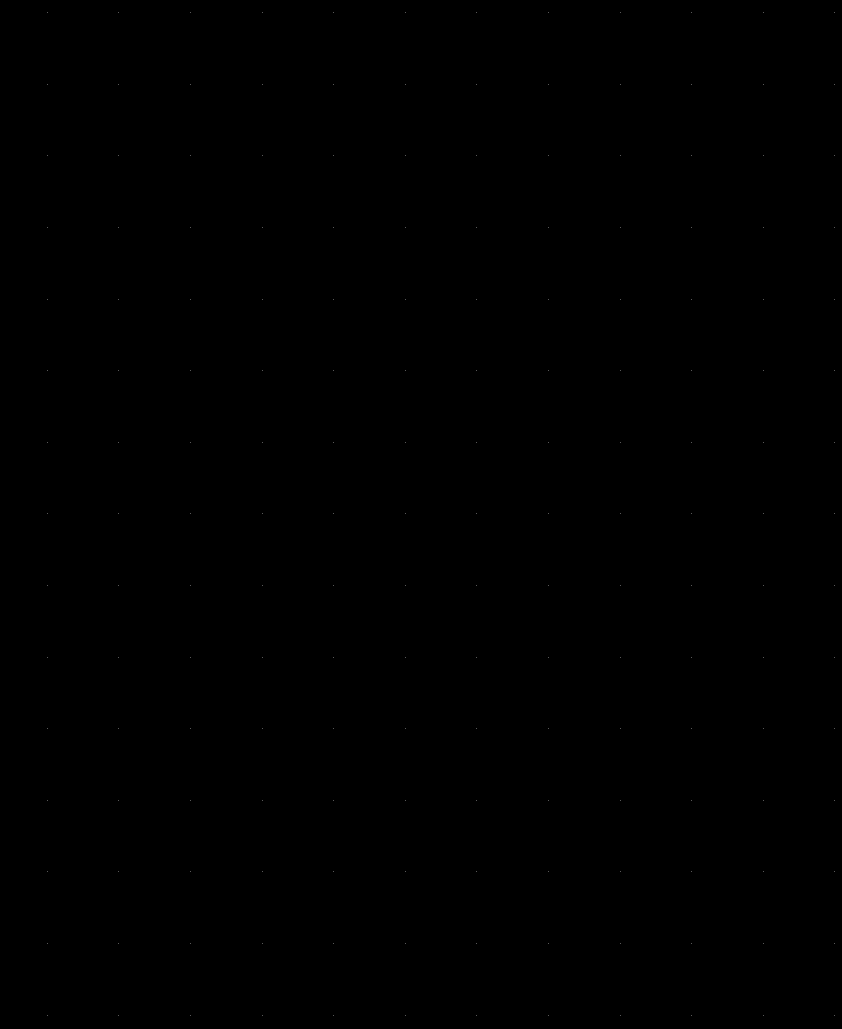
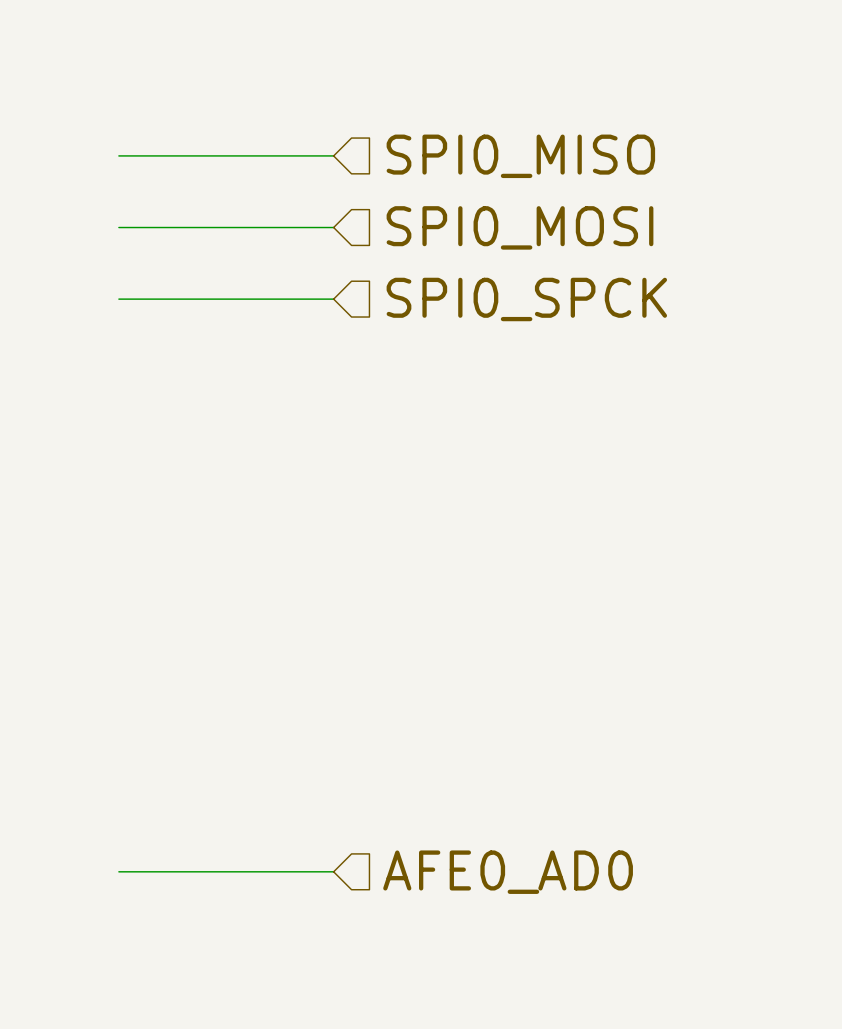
wire: none -> (118, 155) (333, 155)
hierarchical label: none -> SPI0_MISO (520, 156)
wire: none -> (118, 227) (333, 227)
hierarchical label: none -> SPI0_MOSI (520, 227)
wire: none -> (118, 299) (333, 299)
hierarchical label: none -> SPI0_SPCK (526, 299)
wire: none -> (118, 871) (333, 871)
hierarchical label: none -> AFE0_AD0 (508, 872)

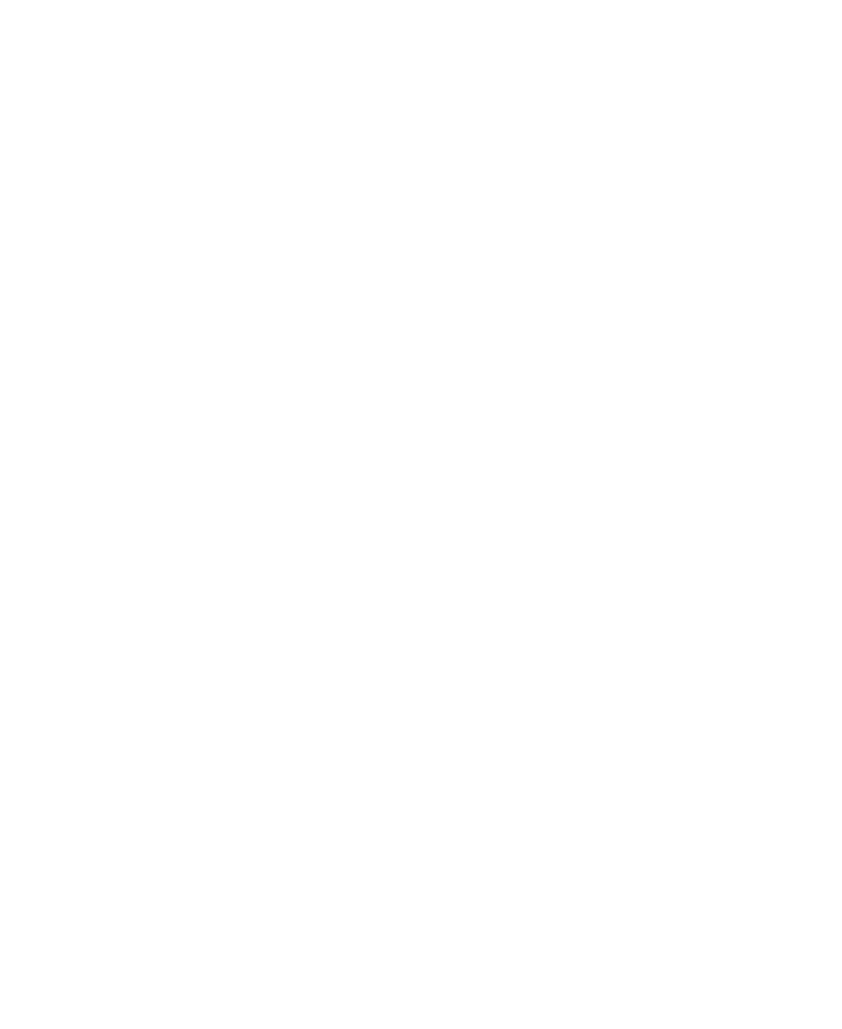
wire: (118, 155) (333, 155) -> none
hierarchical label: SPI0_MISO (520, 156) -> none
wire: (118, 227) (333, 227) -> none
hierarchical label: SPI0_MOSI (520, 227) -> none
wire: (118, 299) (333, 299) -> none
hierarchical label: SPI0_SPCK (526, 299) -> none
wire: (118, 871) (333, 871) -> none
hierarchical label: AFE0_AD0 (508, 872) -> none

